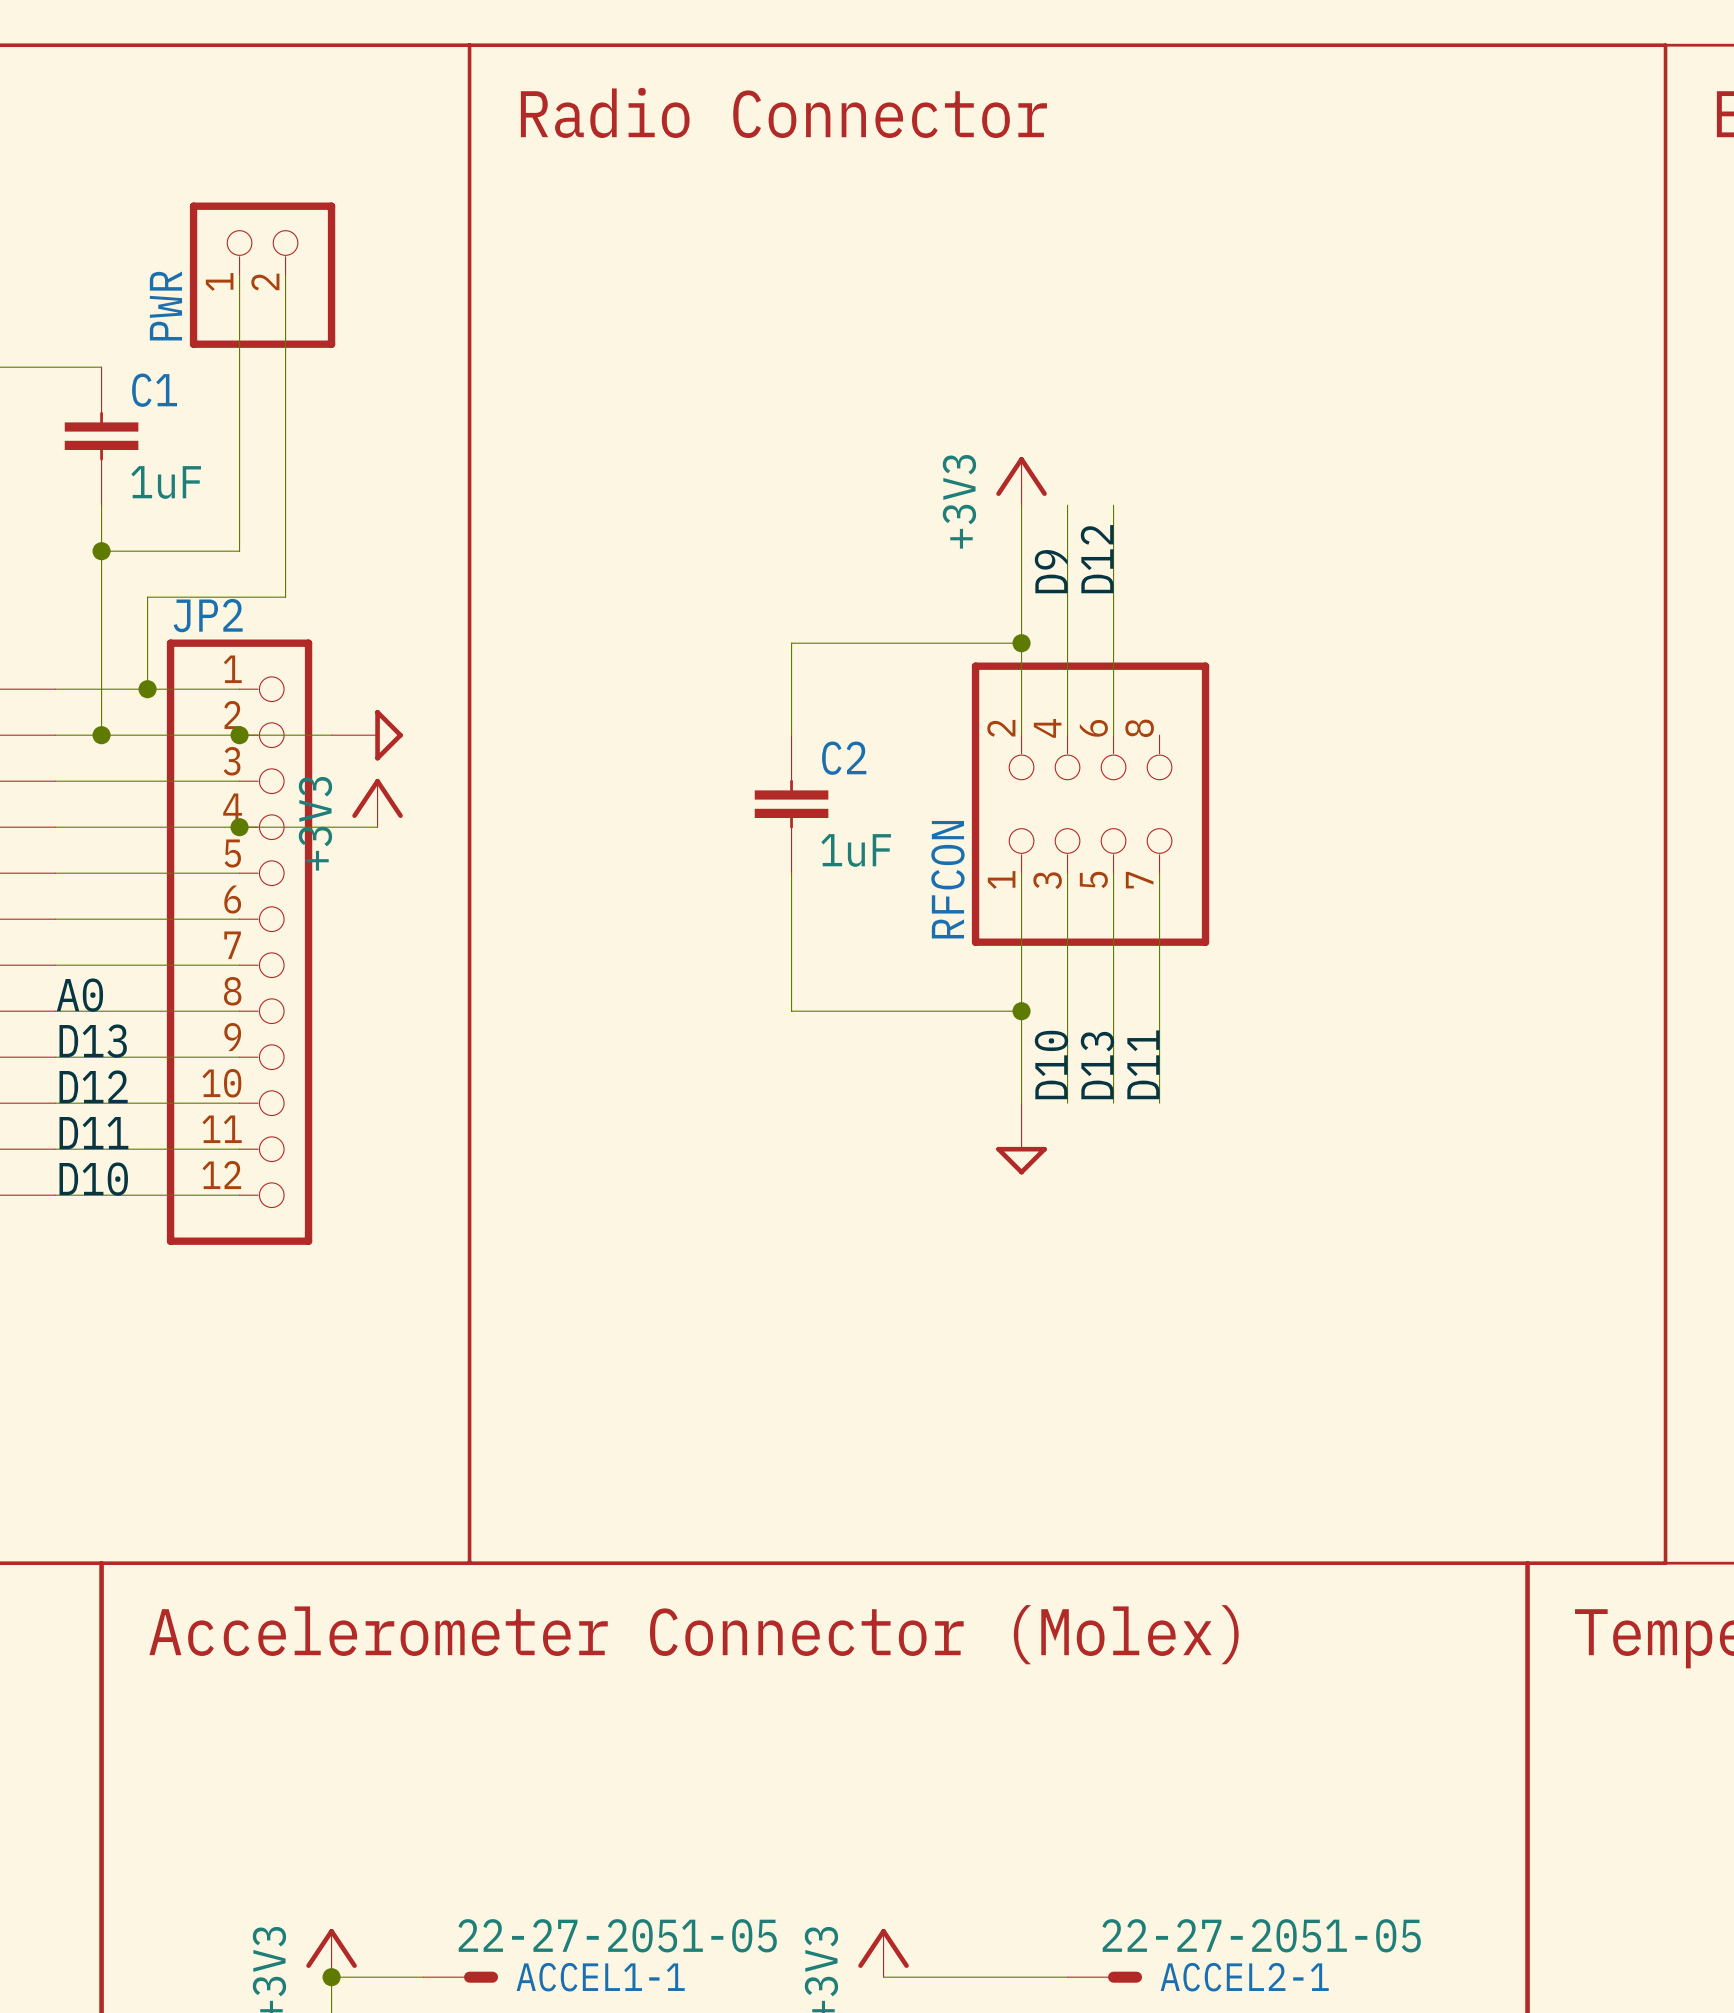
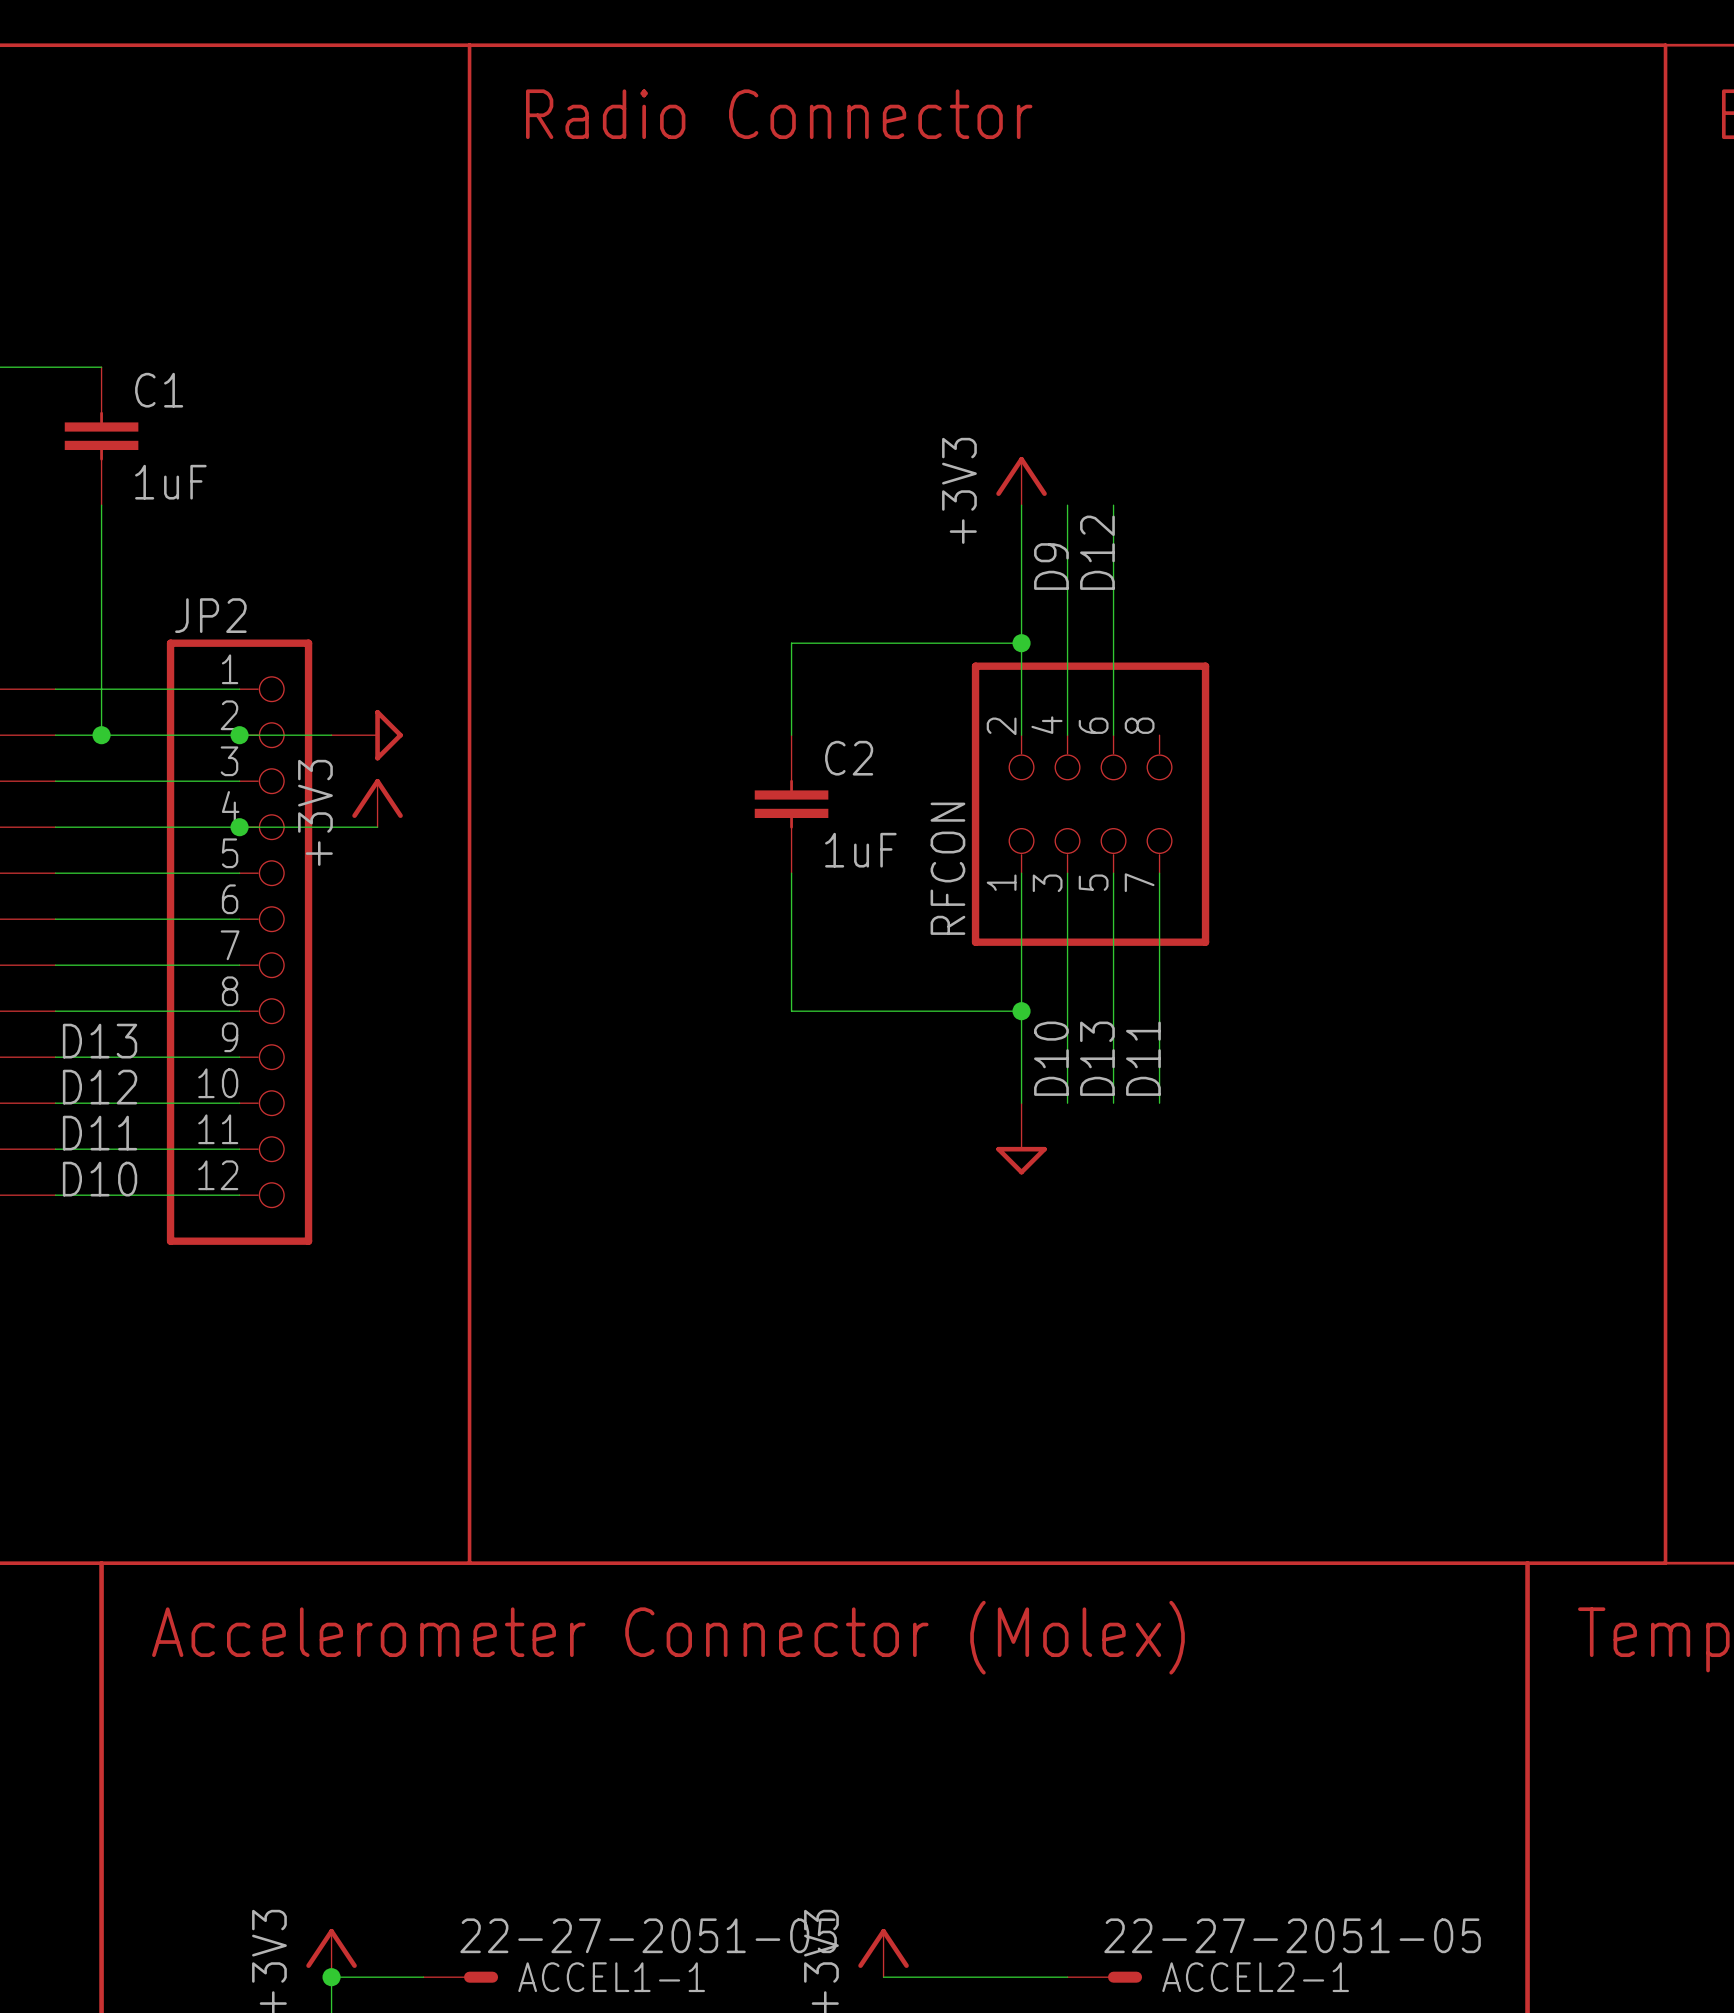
wire: (239, 275) (239, 551) (101, 551) -> none
PWR: (262, 275) -> none
wire: (285, 275) (285, 597) (147, 597) (147, 689) -> none
junction: (101, 551) -> none
junction: (147, 689) -> none
label: A0 (79, 995) -> none

